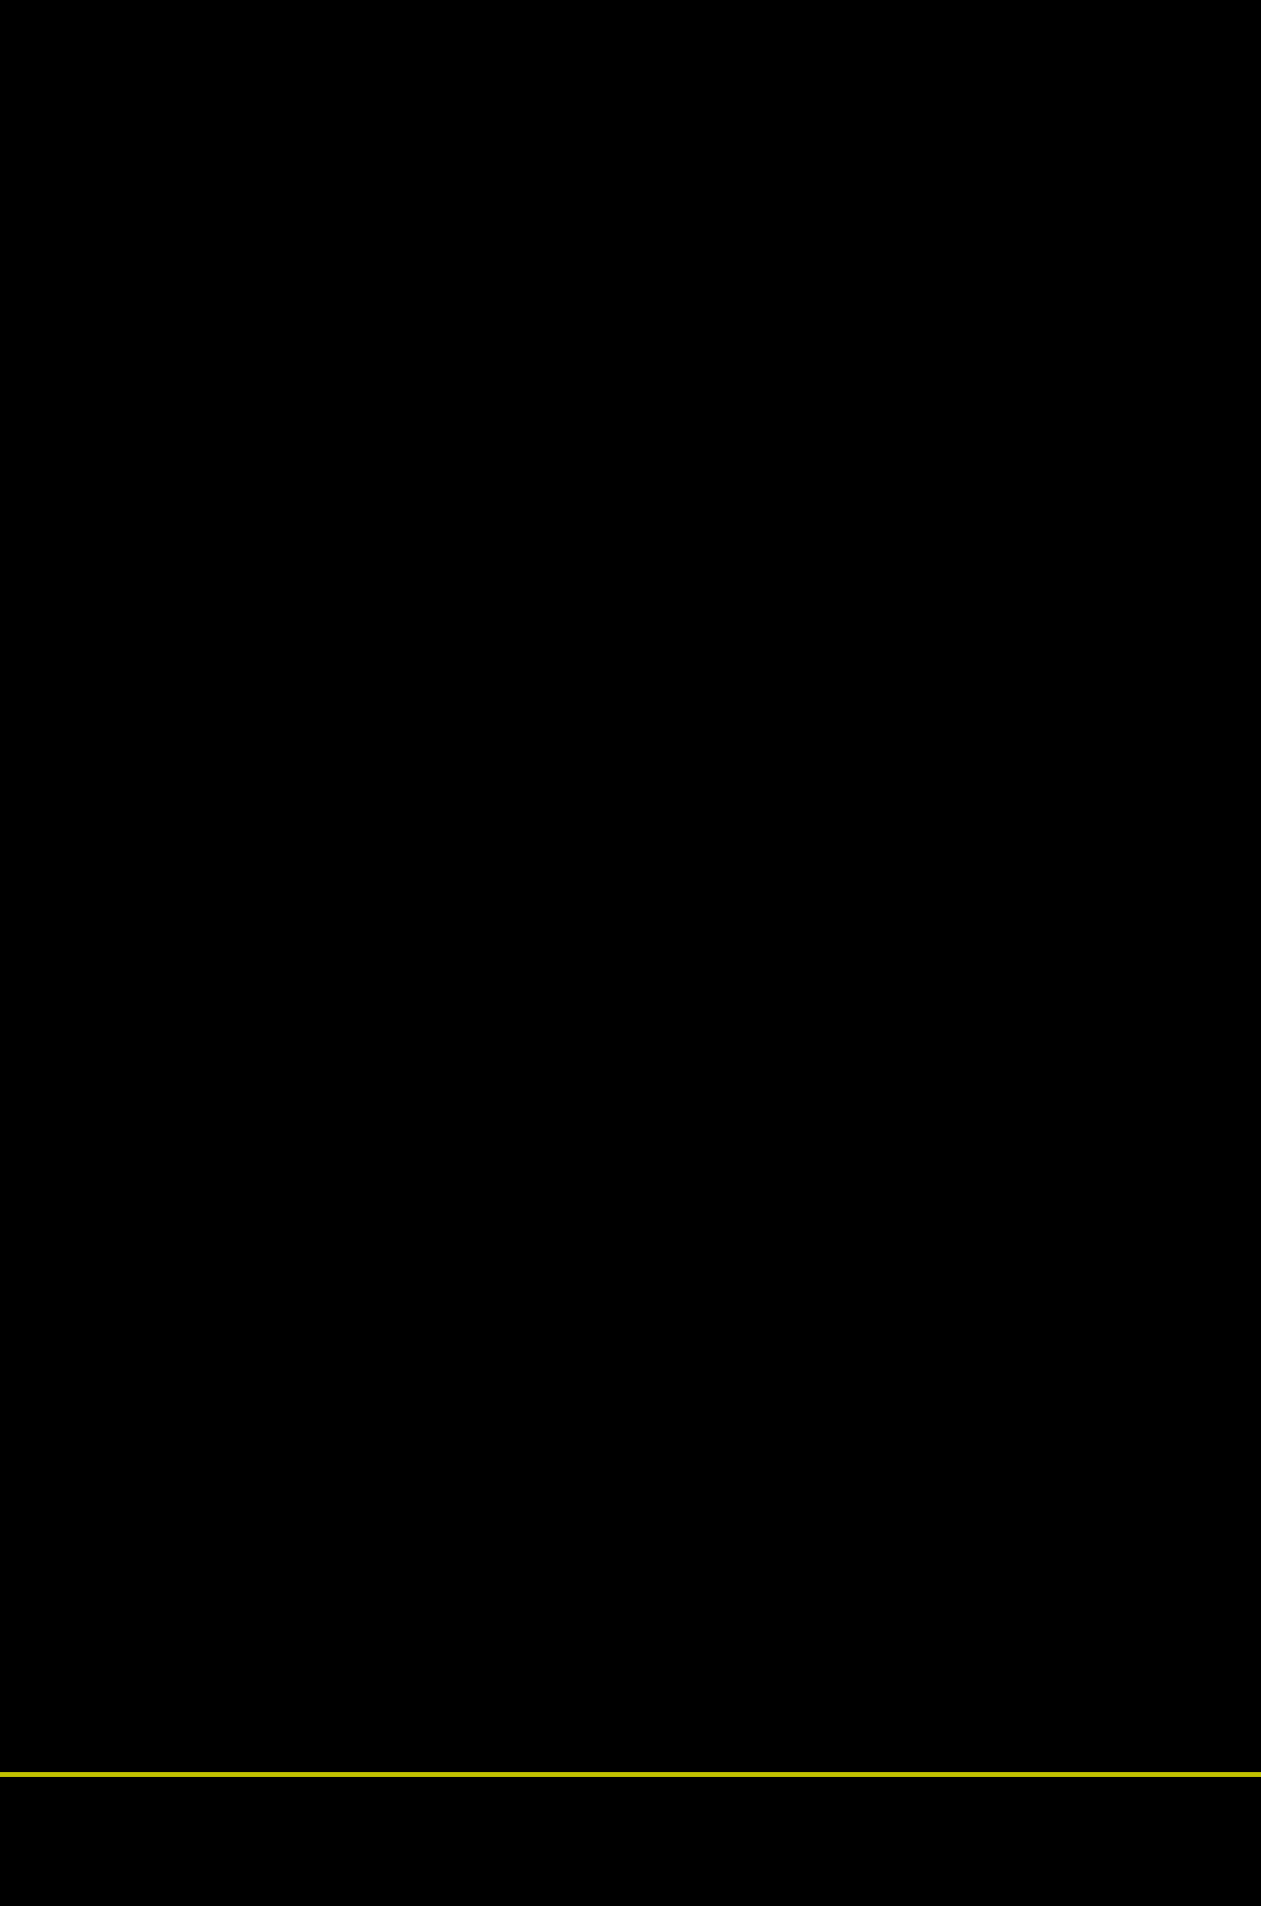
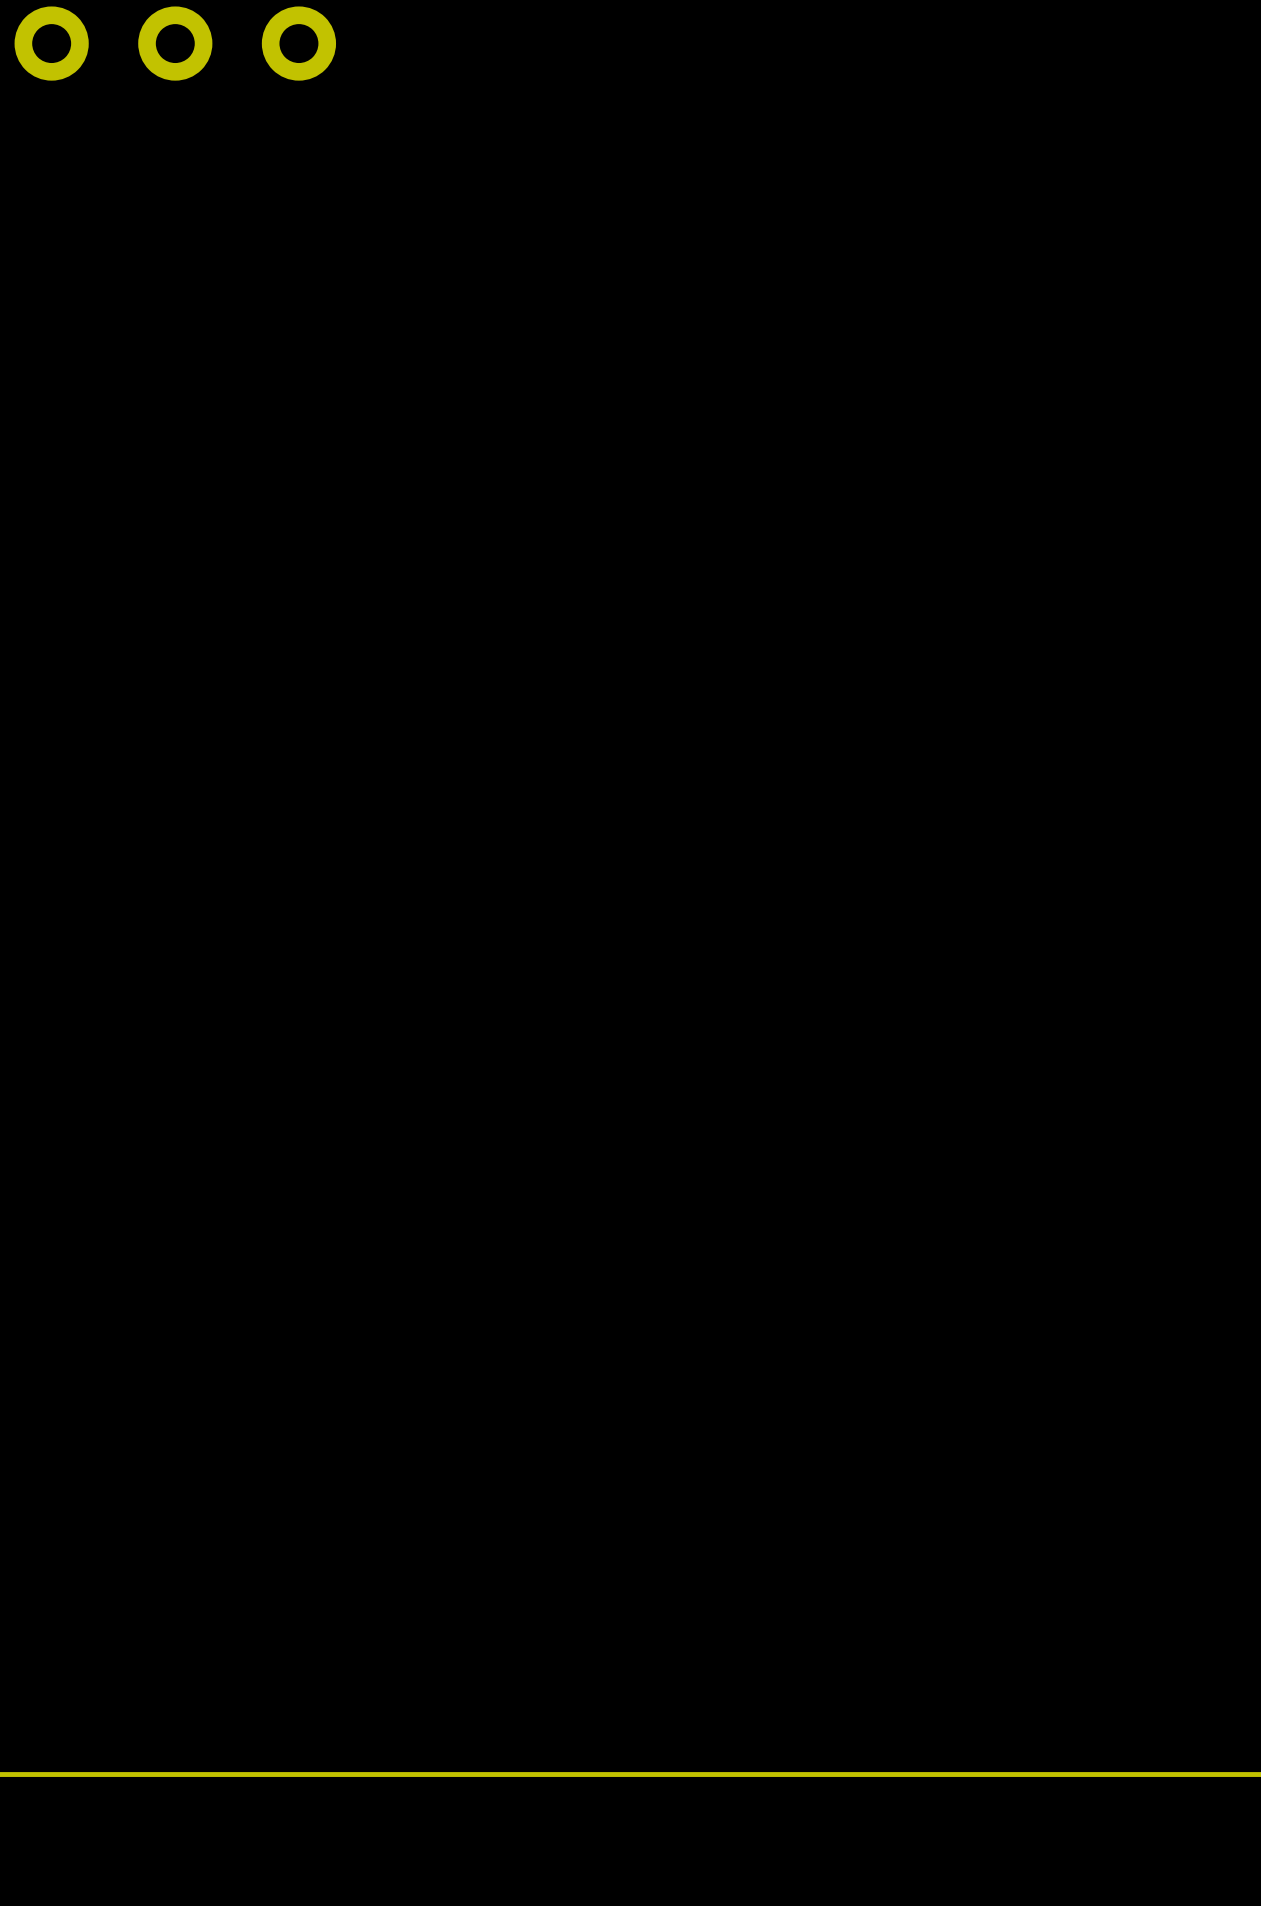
part: none -> (175, 43)

